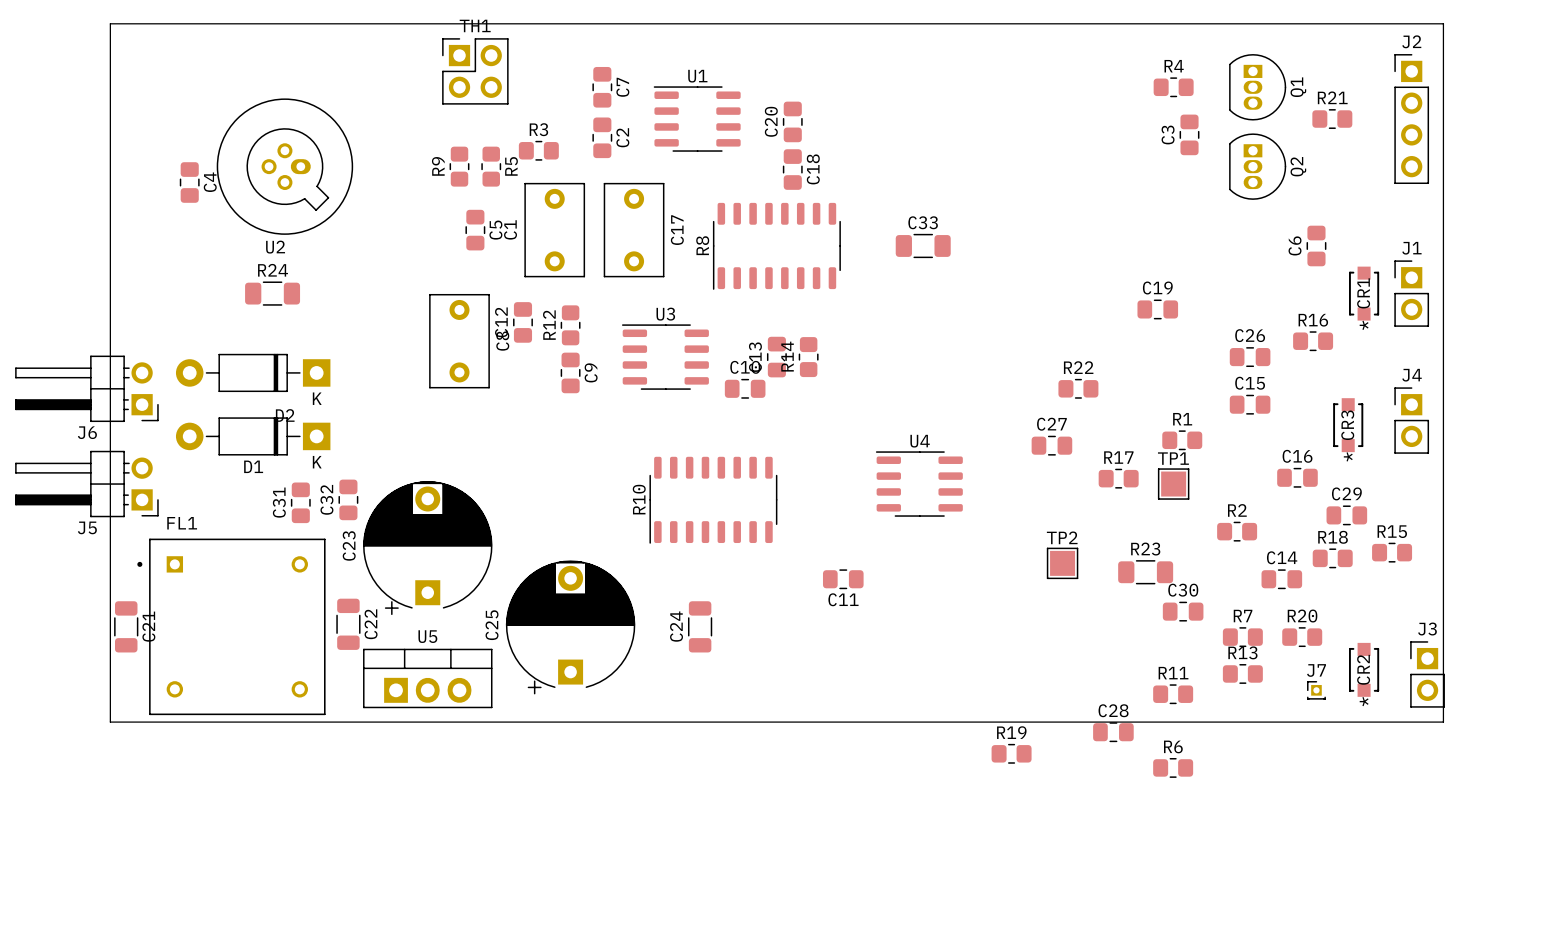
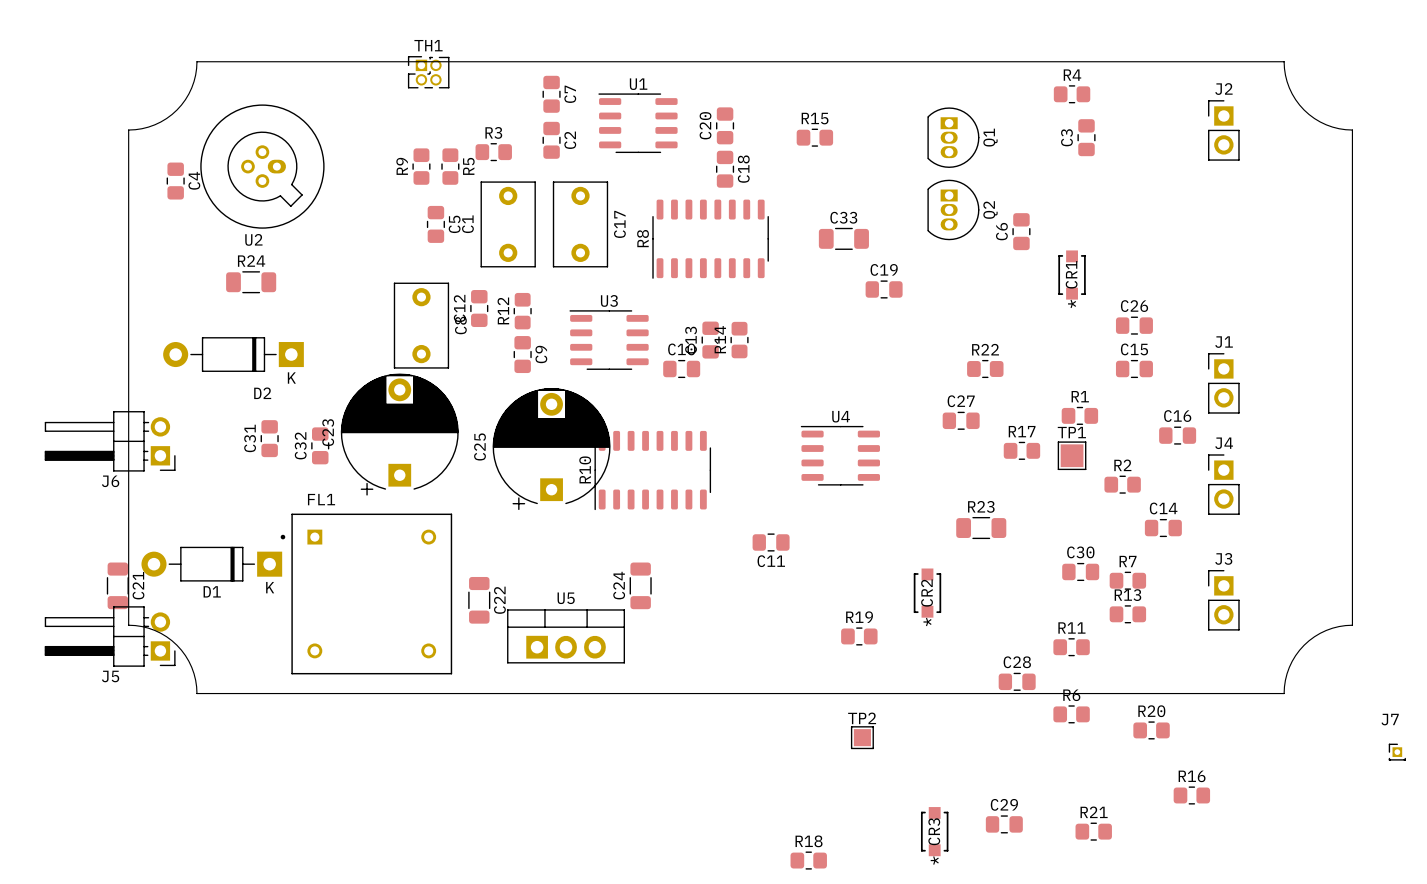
board edge: (110, 23) (1443, 23) (1443, 722) (110, 722) (110, 23) -> (196, 61) (191, 87) (176, 110) (154, 124) (128, 130) (128, 625) (154, 630) (176, 645) (191, 667) (196, 693) (1284, 693) (1289, 667) (1304, 645) (1326, 630) (1352, 625) (1352, 130) (1326, 124) (1304, 110) (1289, 87) (1284, 61) (196, 61)
TH1 footprint: [442, 38, 509, 105] -> [407, 56, 450, 89]
J2 name position: J2 (1411, 41) -> J2 (1223, 89)
J2 footprint: [1394, 54, 1430, 185] -> [1208, 100, 1240, 161]
Q1 position: (1257, 87) -> (953, 137)
R21 position: (1332, 119) -> (1093, 831)
Q2 position: (1257, 166) -> (953, 209)
C6 position: (1316, 245) -> (1021, 231)
CR1 position: (1364, 293) -> (1072, 275)
J1 position: (1411, 293) -> (1223, 383)
C19 position: (1157, 309) -> (884, 289)
R16 position: (1313, 341) -> (1191, 795)
C26 position: (1250, 357) -> (1134, 325)
J6 position: (86, 388) -> (110, 441)
C15 position: (1250, 404) -> (1134, 368)
J4 position: (1411, 420) -> (1223, 484)
CR3 position: (1348, 425) -> (934, 831)
D1 position: (253, 436) -> (211, 564)
C16 position: (1297, 477) -> (1177, 435)
J5 position: (86, 484) -> (110, 636)
C32 position: (348, 499) -> (320, 445)
C31 position: (300, 502) -> (269, 438)
C29 position: (1346, 515) -> (1004, 824)
R2 position: (1237, 531) -> (1122, 484)
TP2 footprint: [1046, 547, 1079, 580] -> [850, 726, 874, 750]
C23 position: (427, 548) -> (399, 434)
R15 position: (1392, 552) -> (814, 137)
R18 position: (1332, 558) -> (808, 860)
R23 position: (1145, 572) -> (981, 528)
C14 position: (1281, 579) -> (1163, 528)
C22 position: (348, 624) -> (479, 600)
FL1 position: (231, 626) -> (366, 593)
C25 position: (570, 627) -> (551, 449)
R7 position: (1242, 637) -> (1127, 580)
R20 position: (1302, 637) -> (1151, 730)
CR2 position: (1364, 669) -> (927, 593)
J7 name position: J7 (1316, 670) -> J7 (1390, 719)
R13 position: (1242, 673) -> (1127, 614)
J3 position: (1427, 674) -> (1223, 600)
U5 position: (427, 678) -> (566, 636)
J7 position: (1316, 690) -> (1397, 752)
R19 position: (1011, 753) -> (859, 636)

